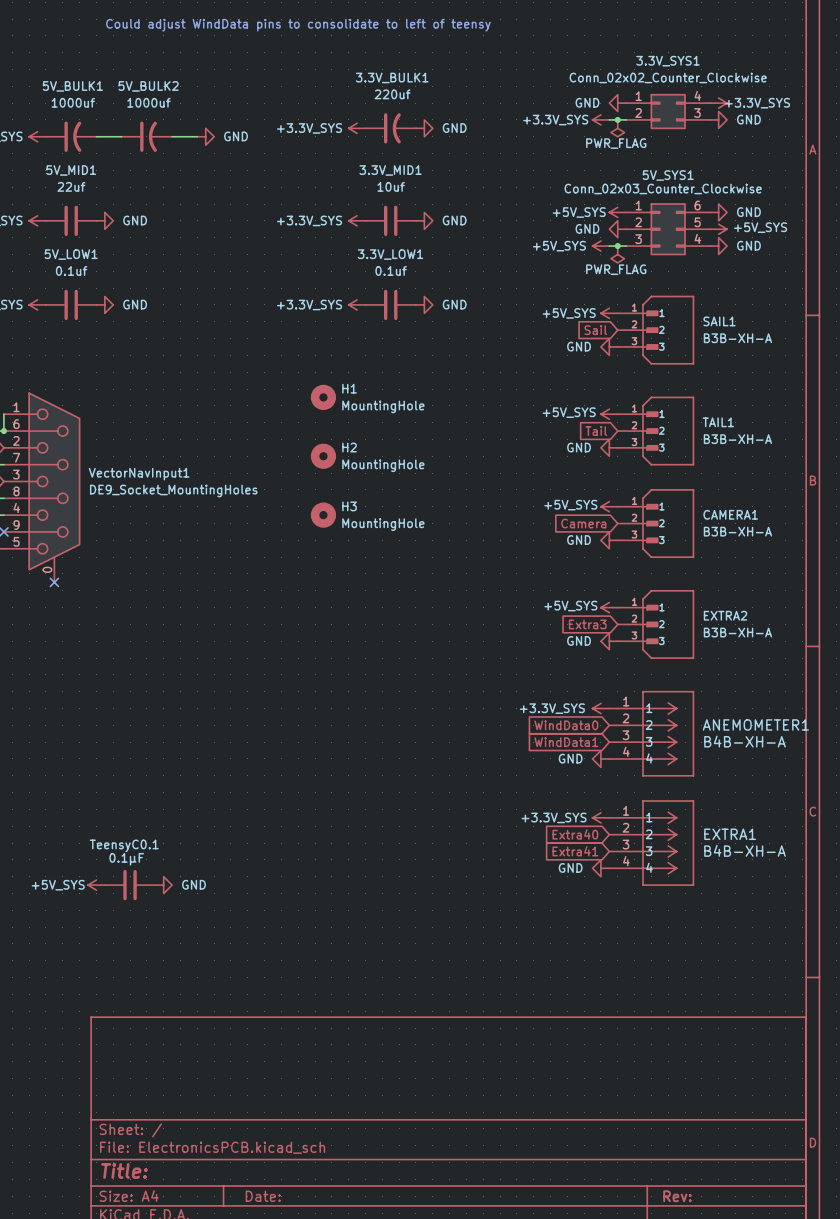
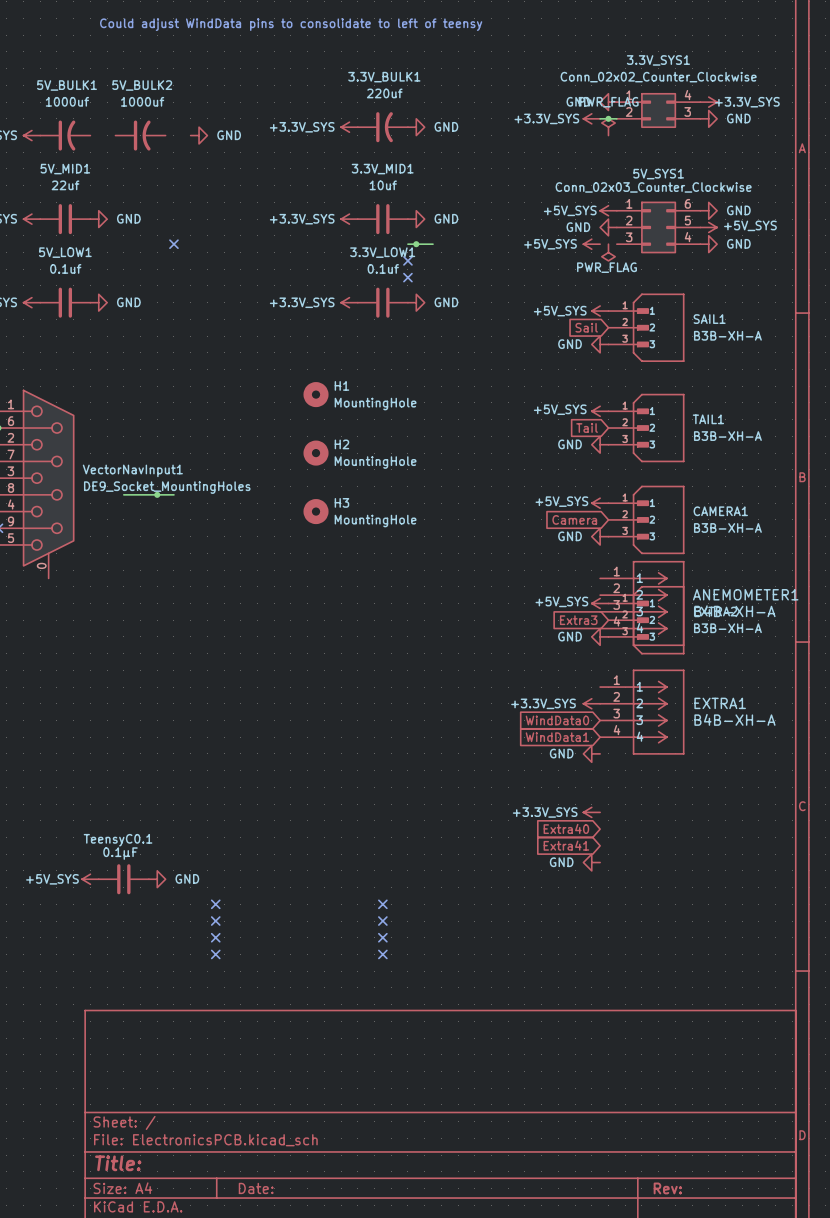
power symbol rotation: 0° (617, 128) -> 180° (608, 127)
wire: (96, 136) (121, 136) -> none
wire: (172, 136) (197, 136) -> none
no-connect mark: none -> (173, 244)
wire: none -> (407, 244) (433, 244)
junction: none -> (416, 244)
wire: (609, 246) (626, 246) -> none
junction: (617, 246) -> none
no-connect mark: none -> (407, 260)
no-connect mark: none -> (407, 277)
wire: none -> (123, 494) (173, 494)
junction: none -> (157, 494)
no-connect mark: (54, 582) -> none
ANEMOMETER1 position: (651, 733) -> (642, 603)
EXTRA1 position: (651, 843) -> (642, 712)
no-connect mark: none -> (215, 904)
no-connect mark: none -> (382, 904)
no-connect mark: none -> (215, 921)
no-connect mark: none -> (382, 921)
no-connect mark: none -> (215, 937)
no-connect mark: none -> (382, 937)
no-connect mark: none -> (215, 954)
no-connect mark: none -> (382, 954)

